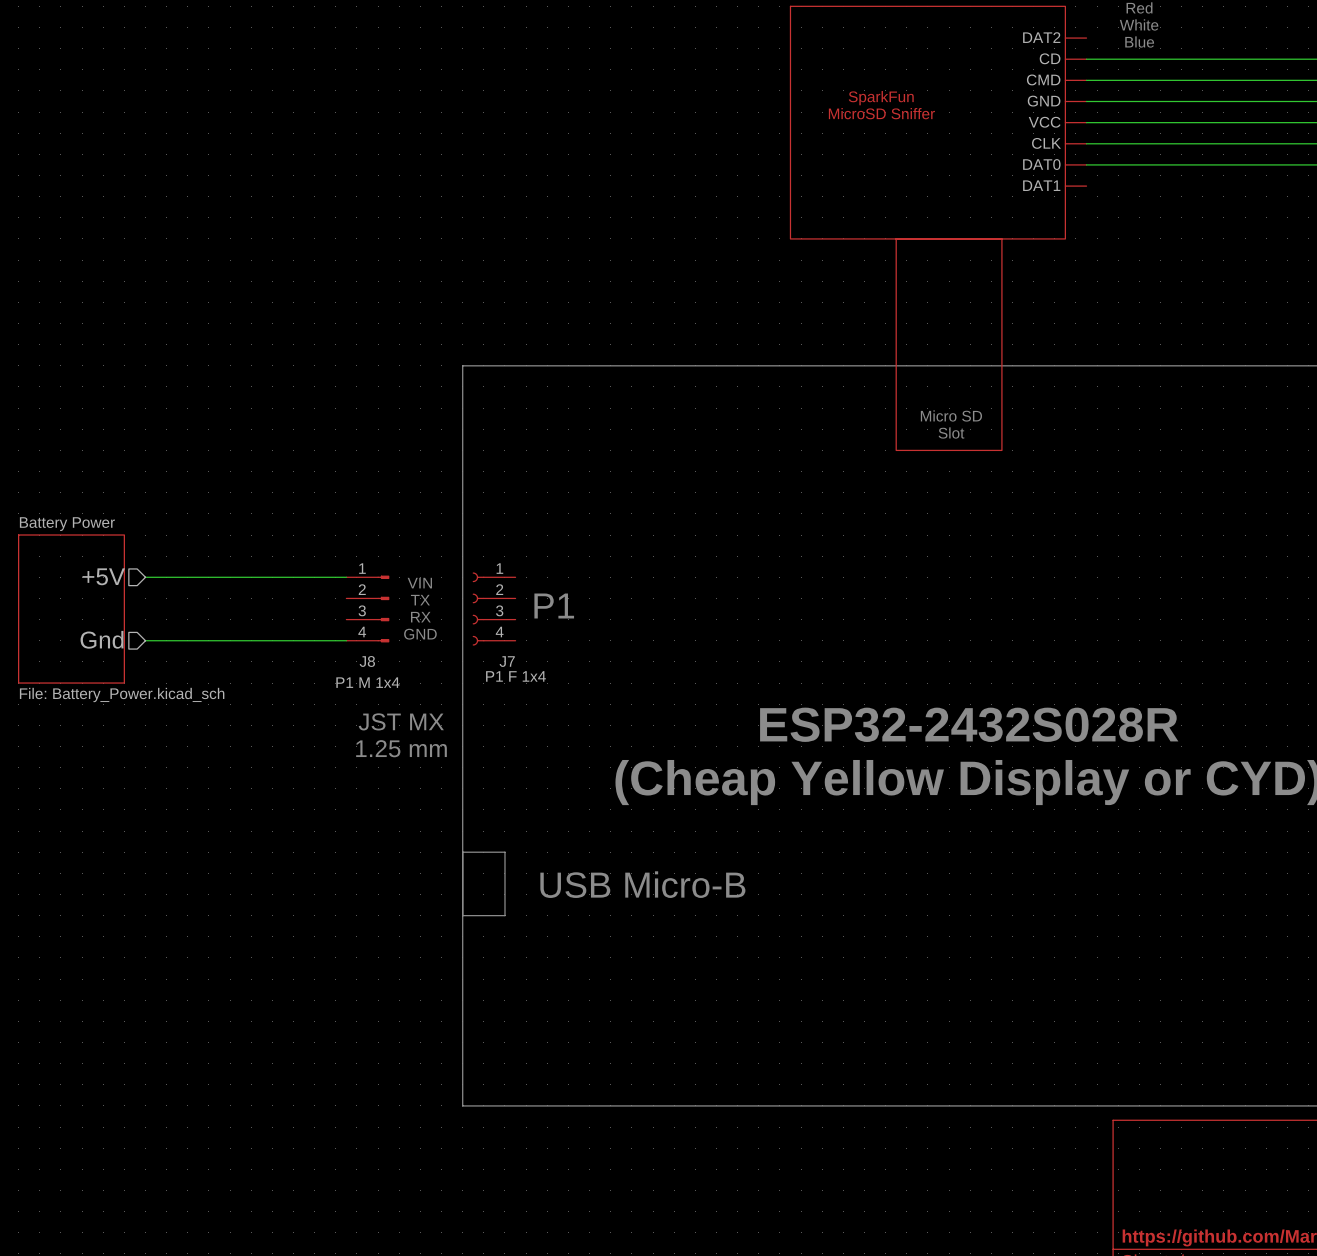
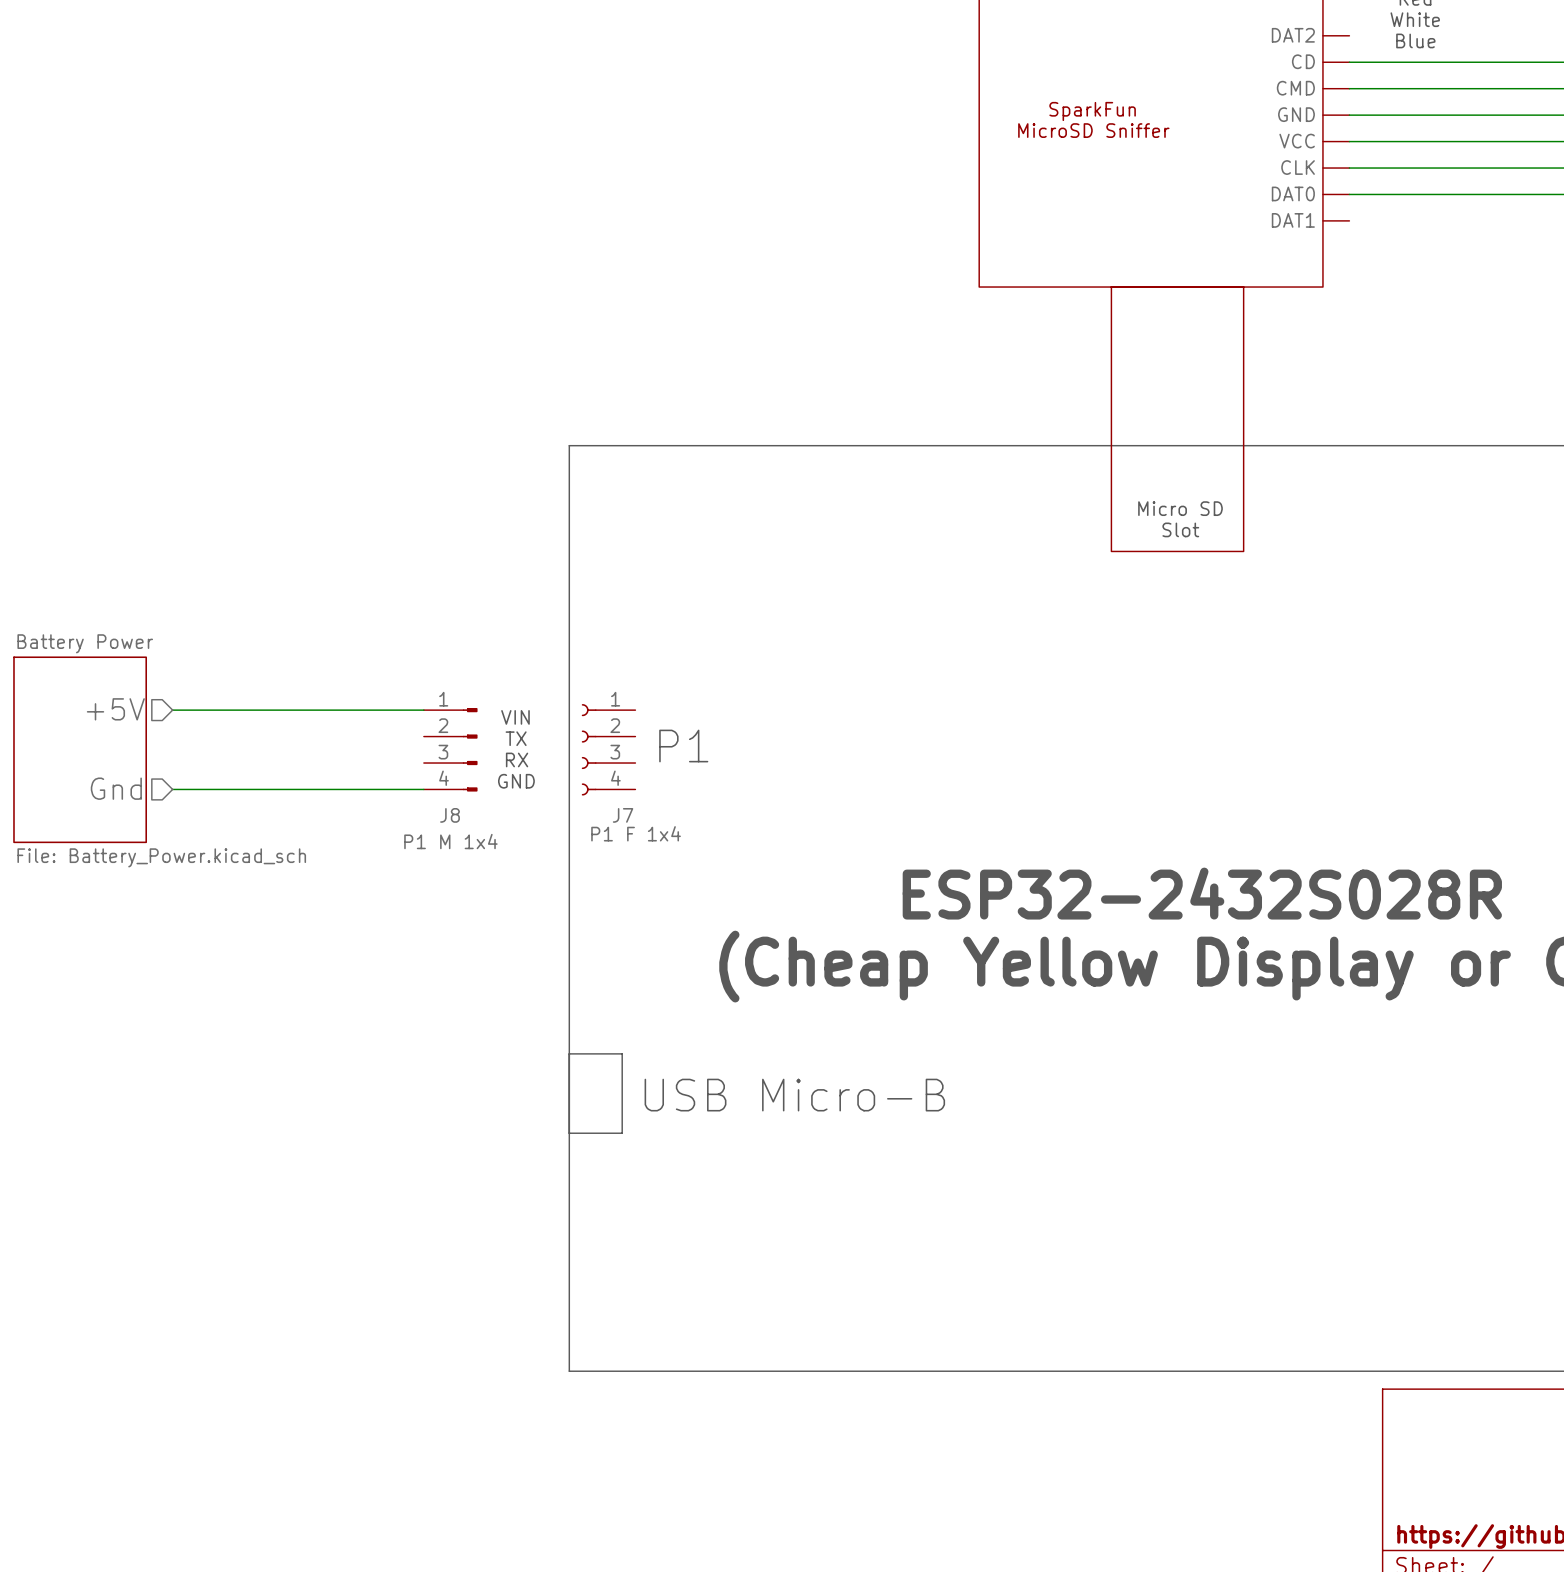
text: JST MX (401, 721) -> none
text: 1.25 mm (401, 748) -> none

